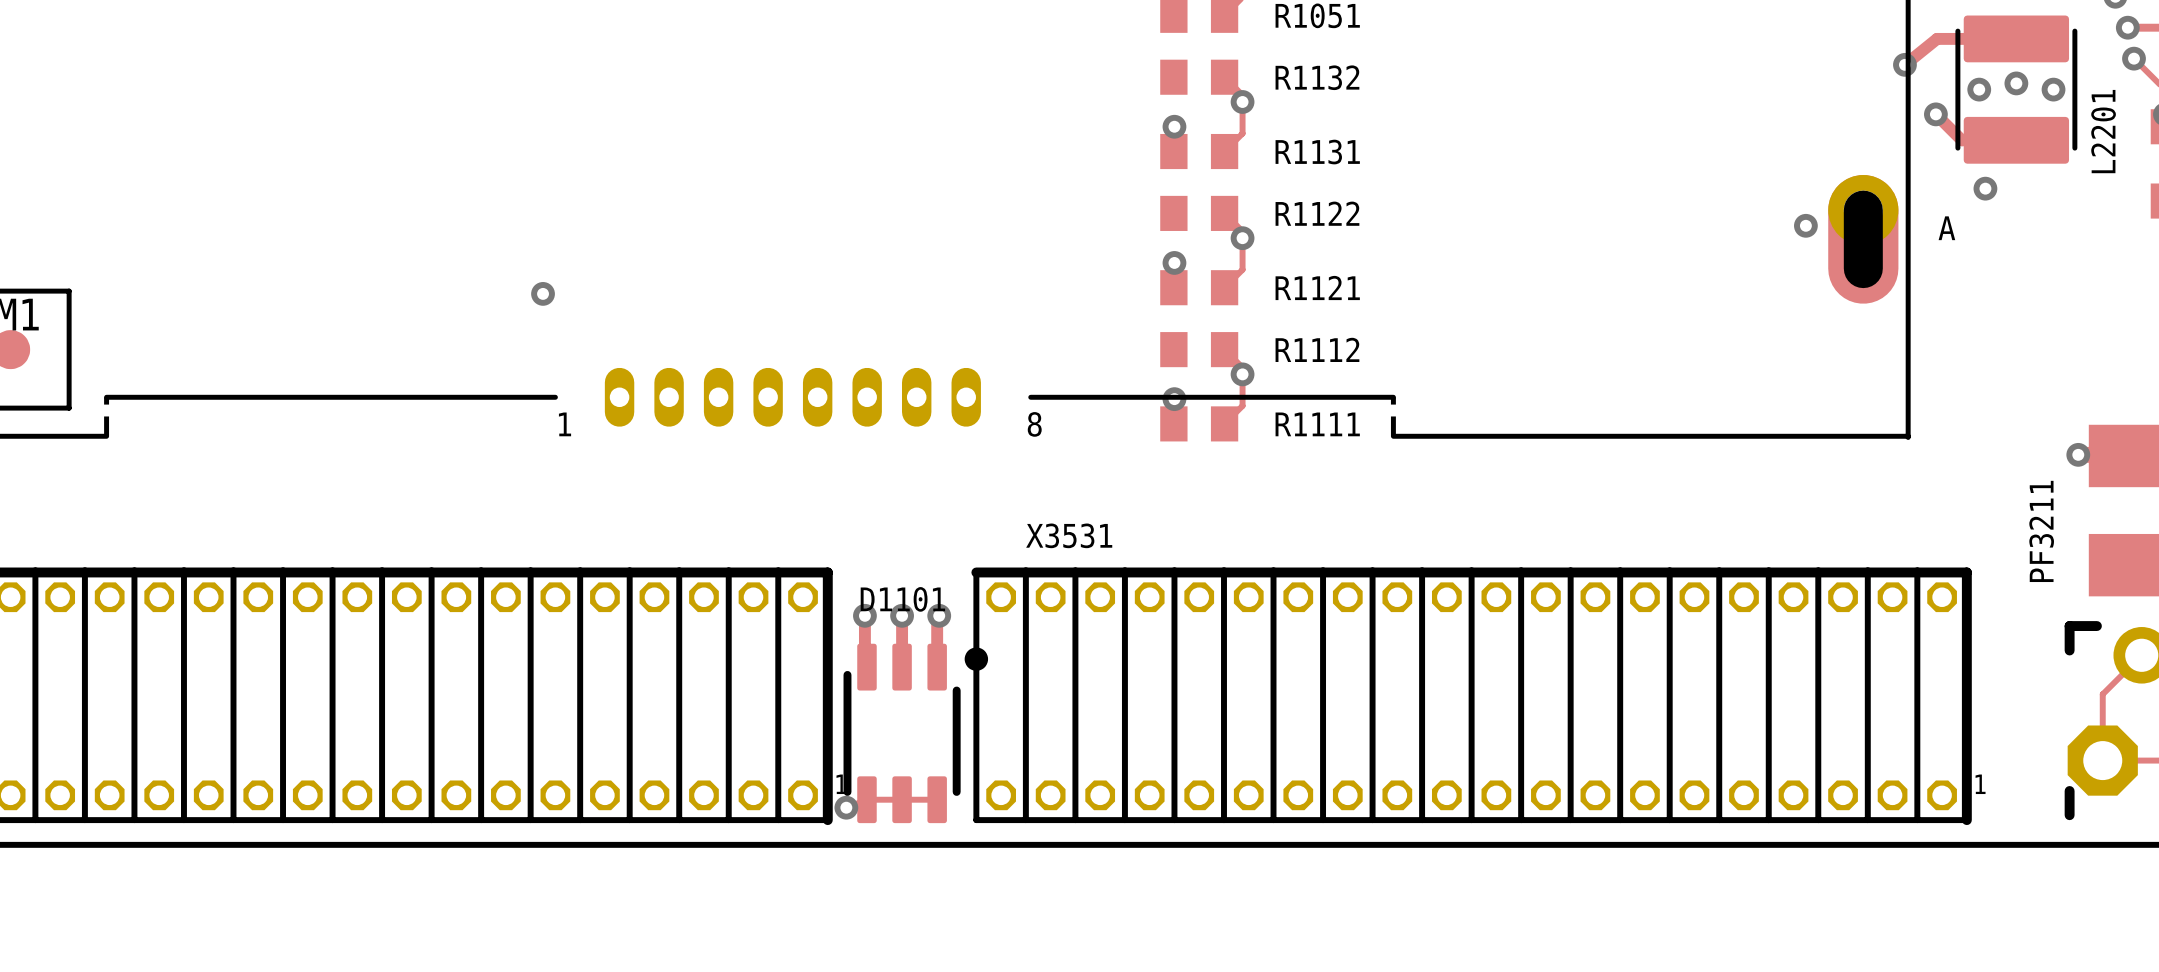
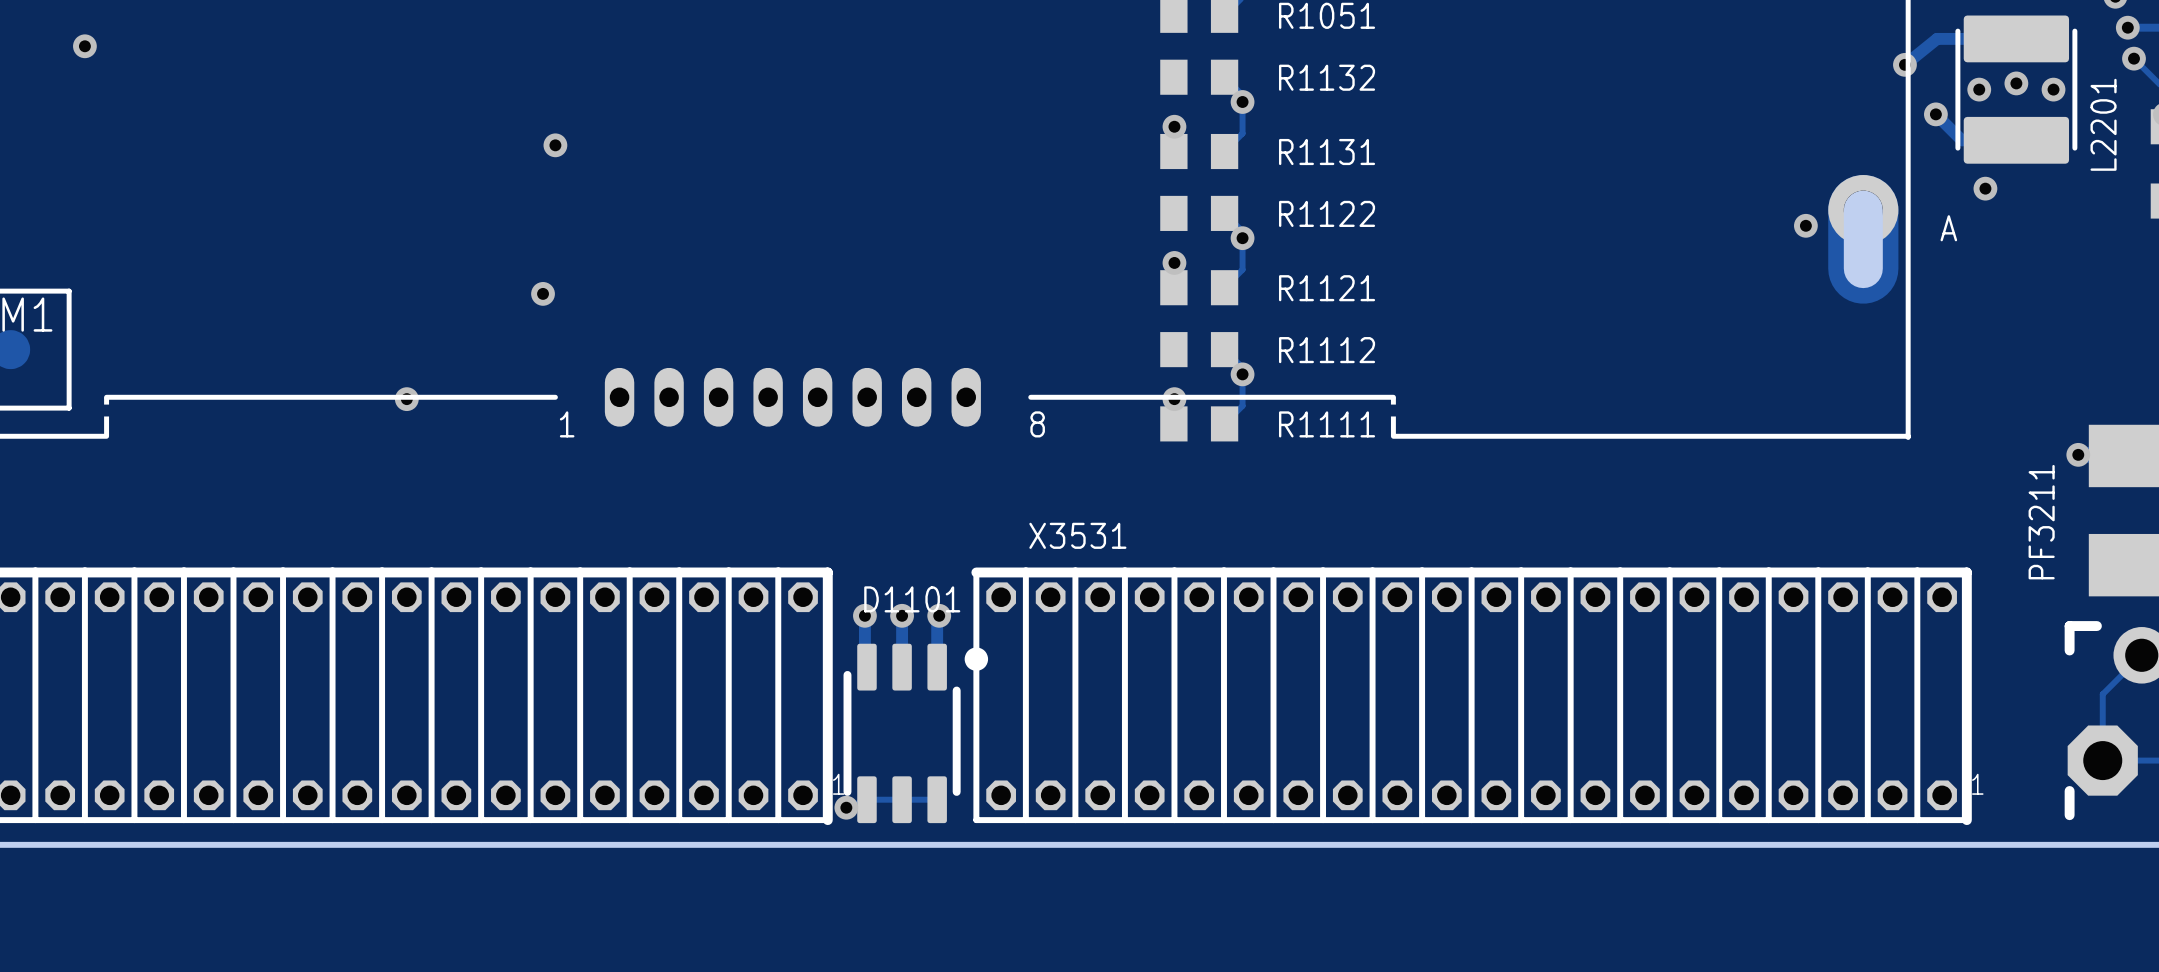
via: none -> (84, 46)
via: none -> (555, 145)
via: none -> (406, 399)

